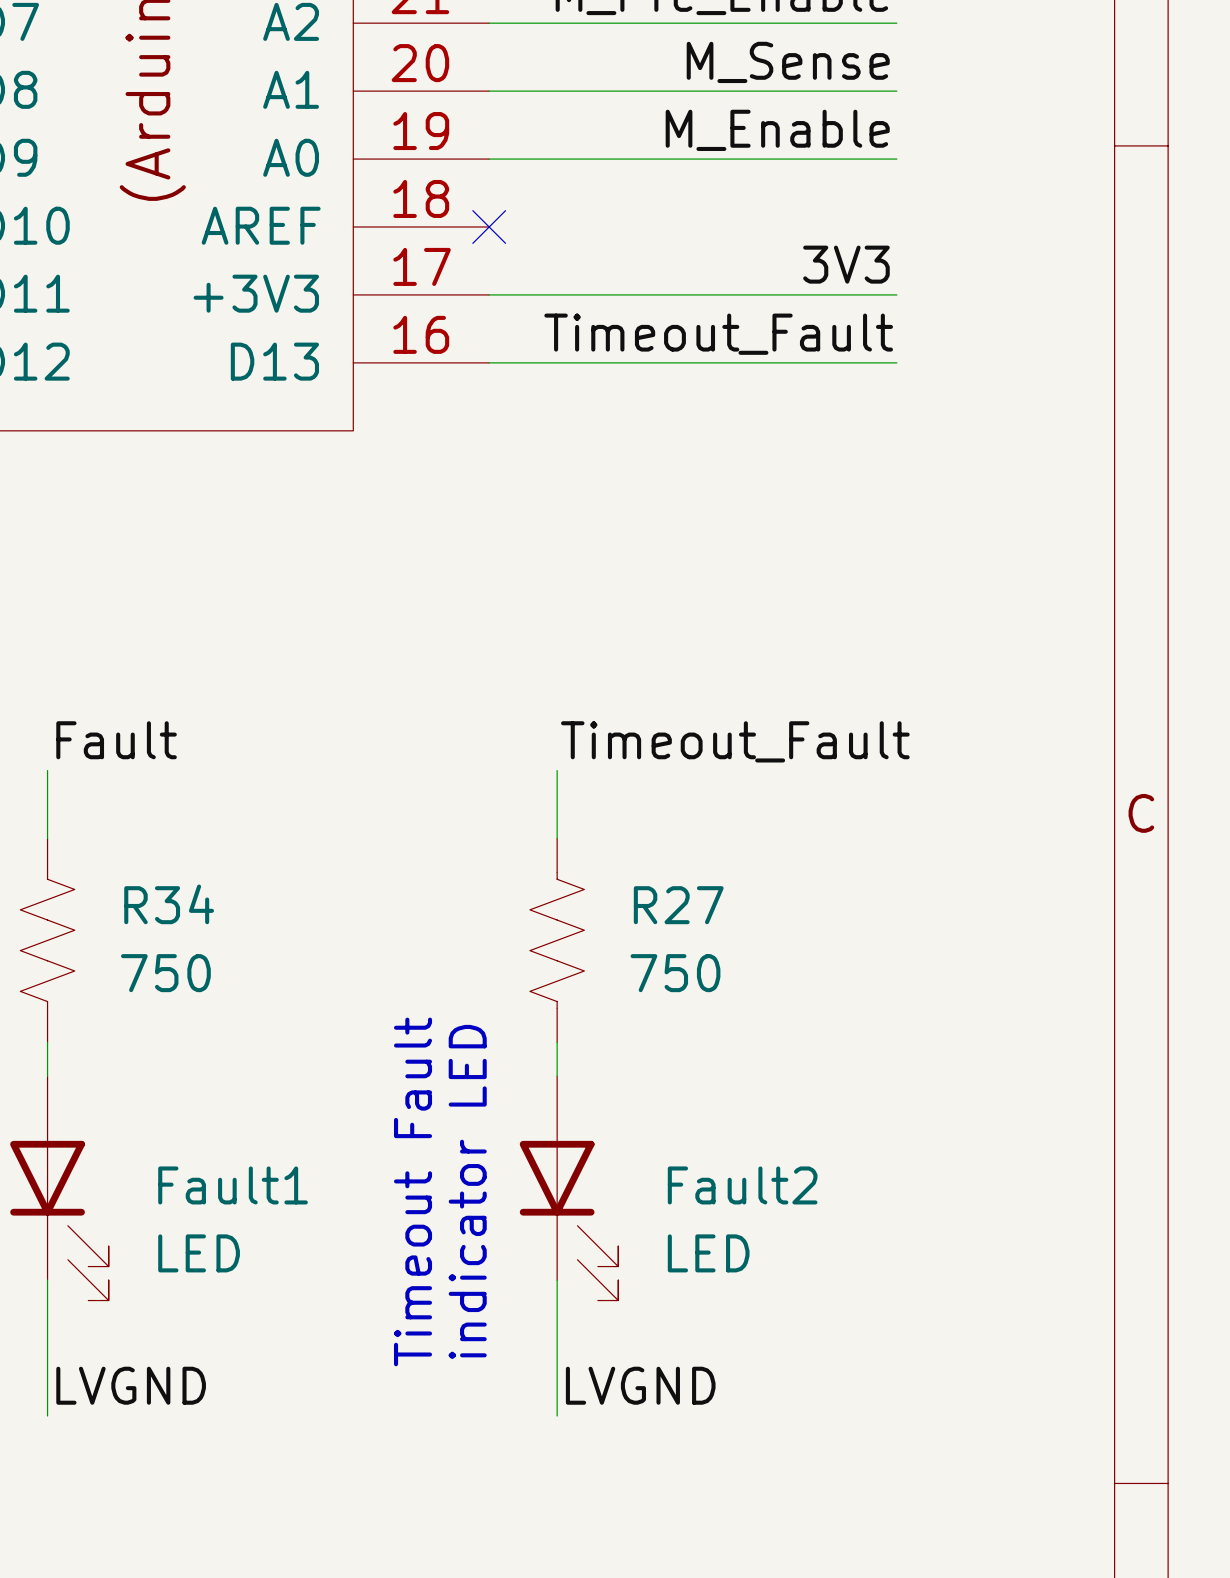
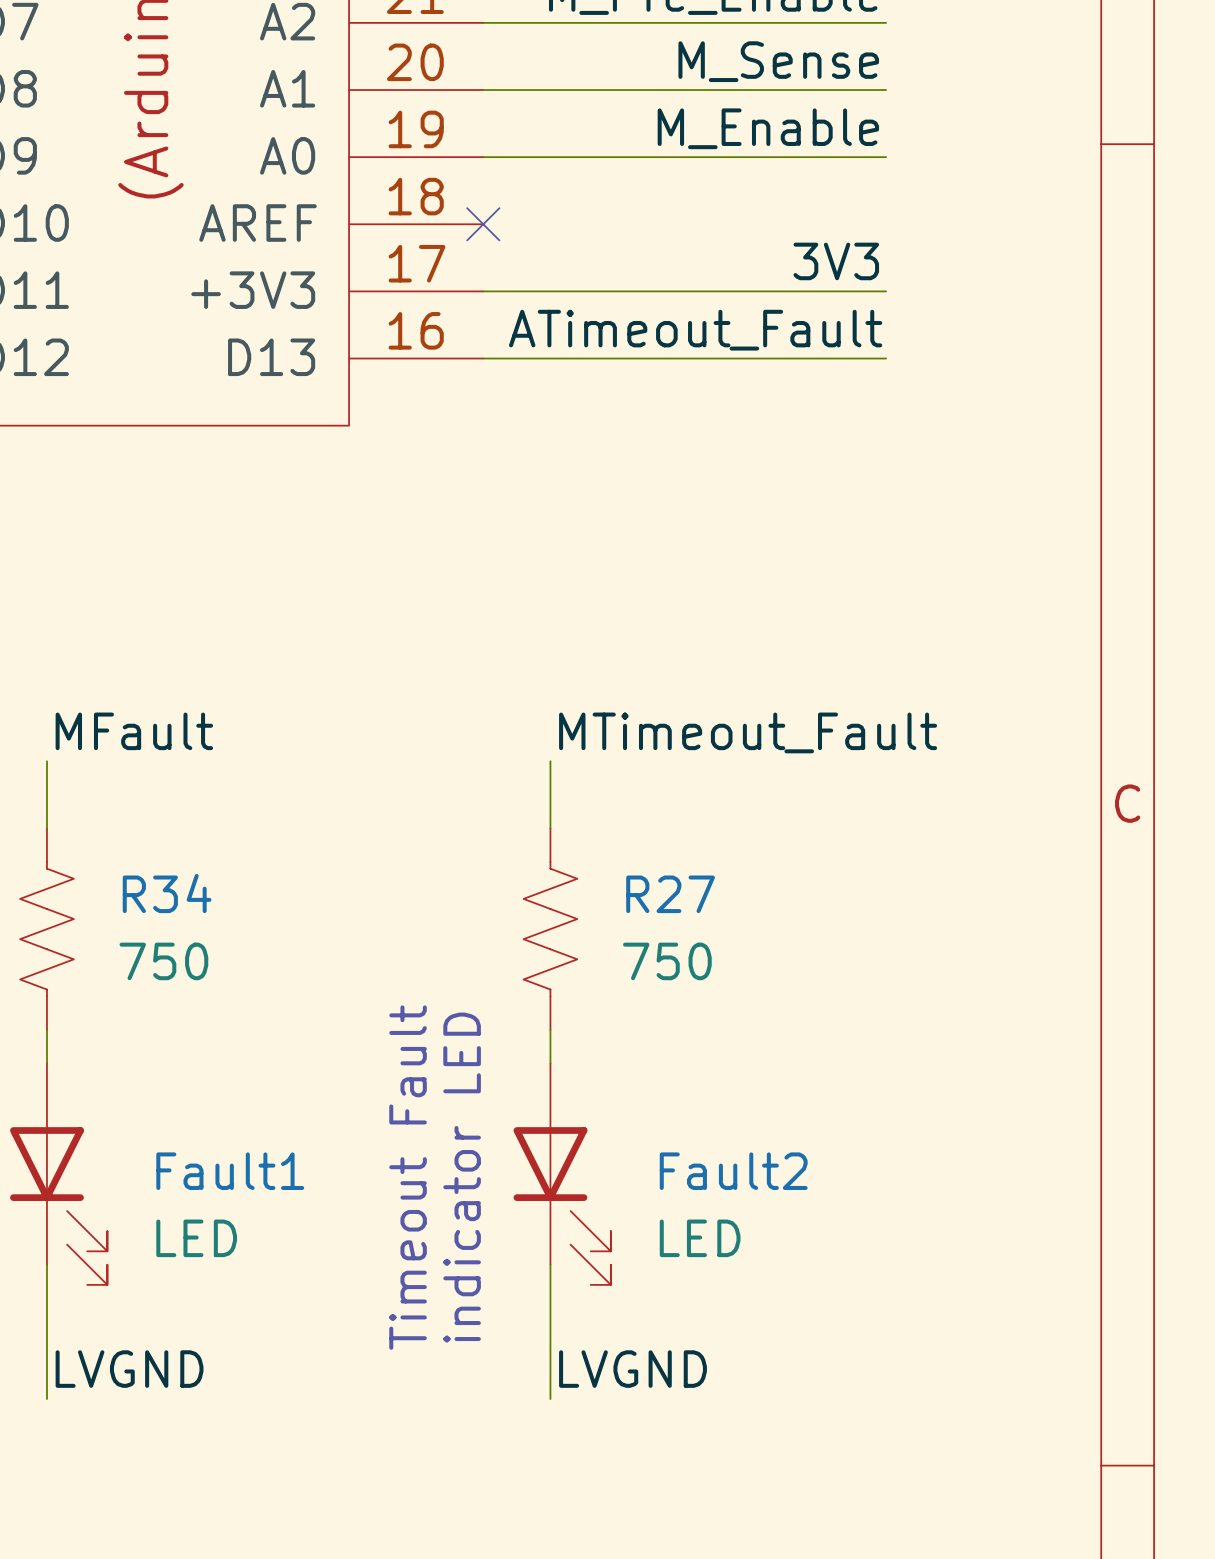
label: Timeout_Fault (718, 334) -> ATimeout_Fault (695, 330)
label: Fault (116, 740) -> MFault (134, 731)
label: Timeout_Fault (735, 741) -> MTimeout_Fault (748, 732)

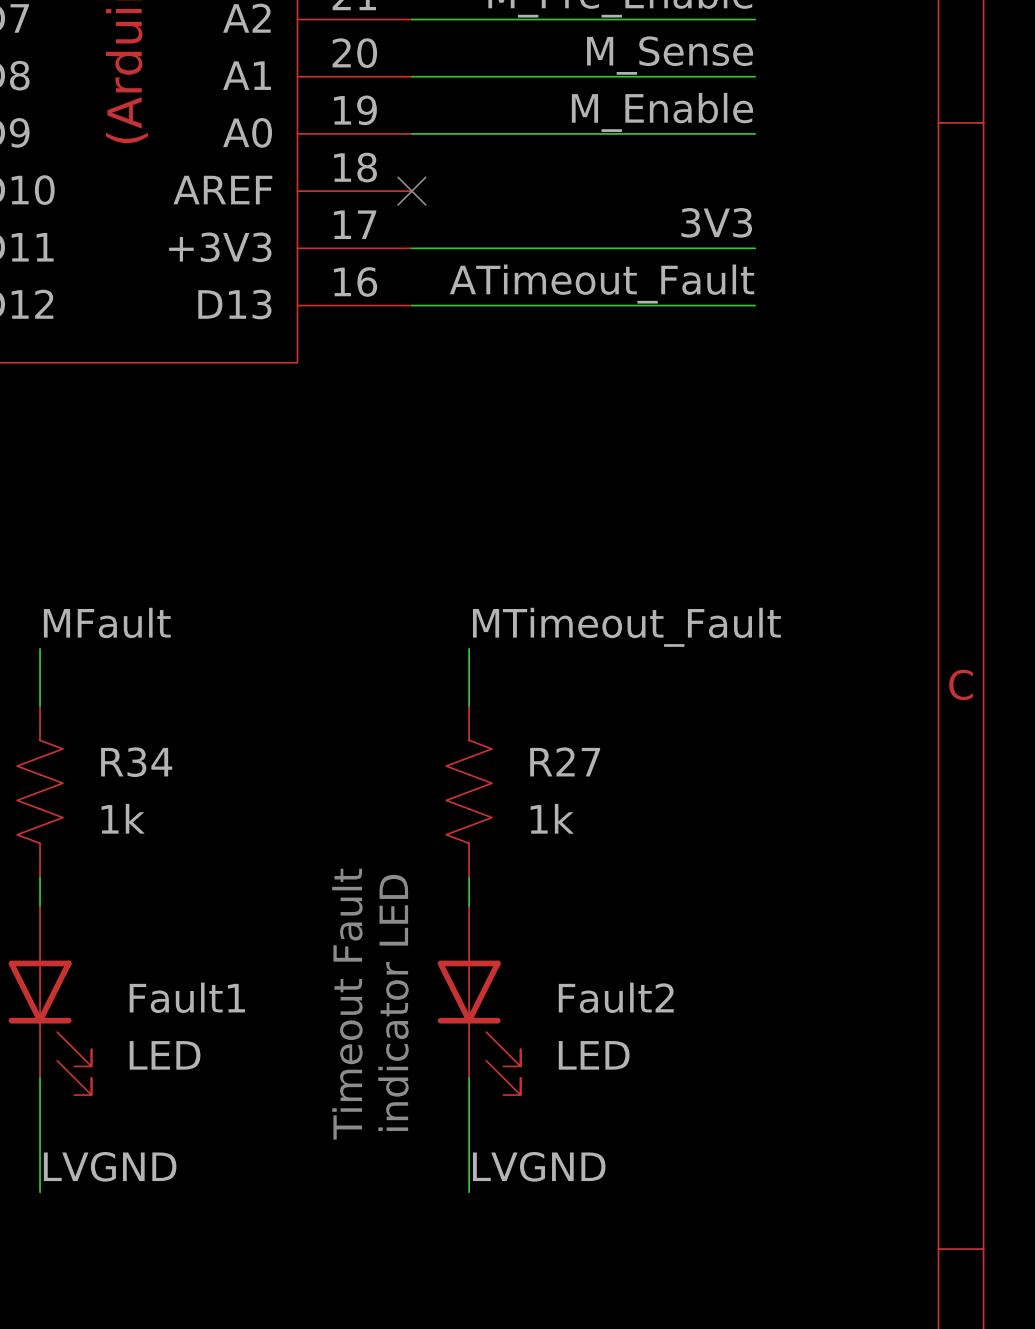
R34 value: 750 (163, 961) -> 1k (123, 818)
R27 value: 750 (667, 961) -> 1k (552, 818)

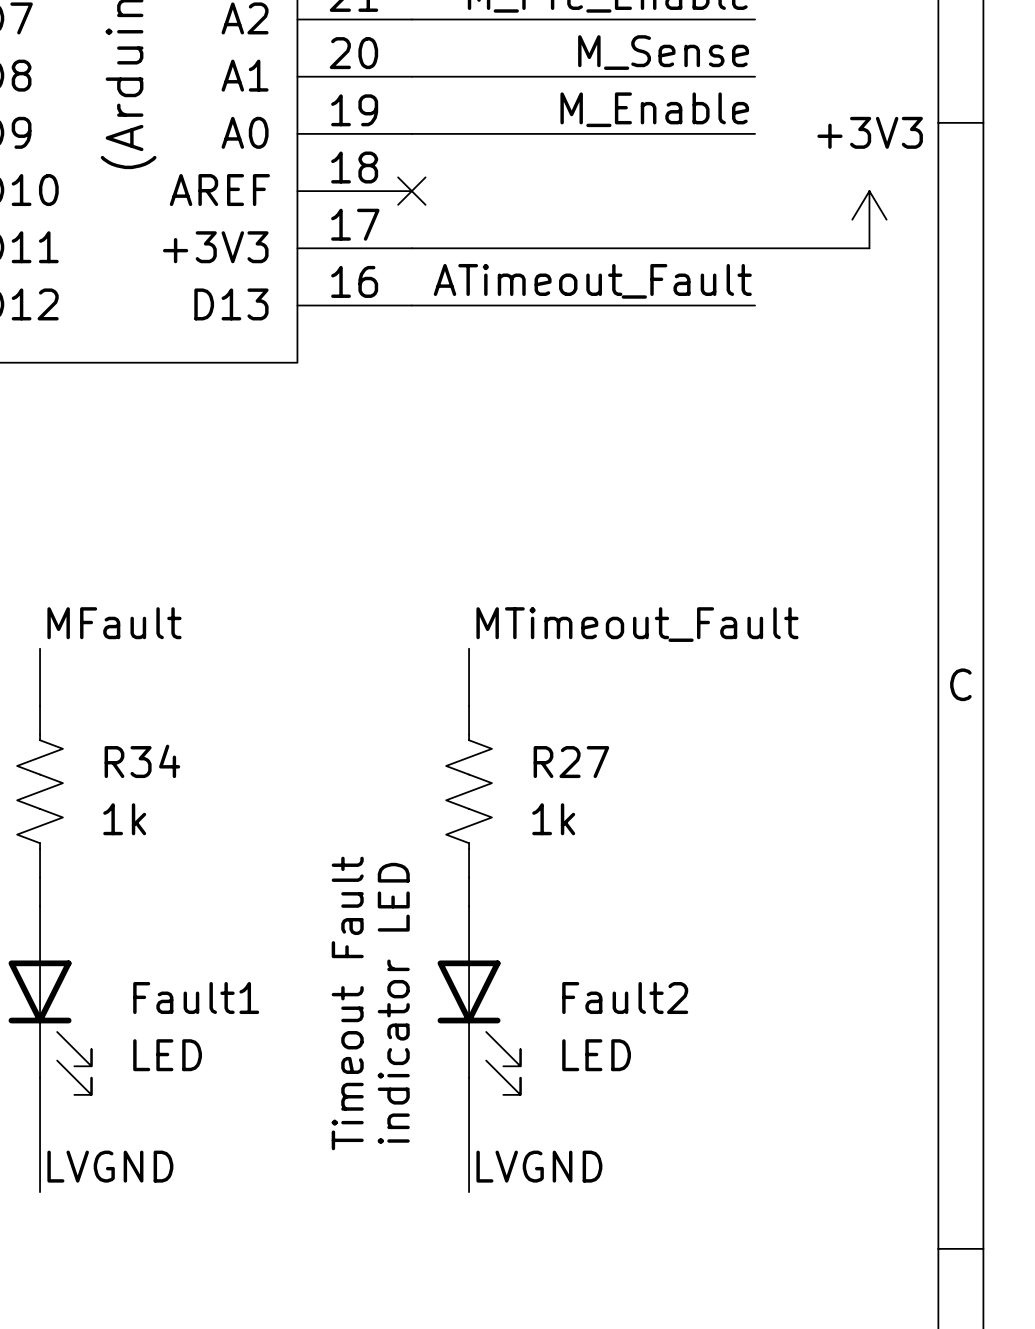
power symbol: none -> +3V3 (869, 219)
label: 3V3 (716, 222) -> none
wire: none -> (755, 248) (869, 248)

